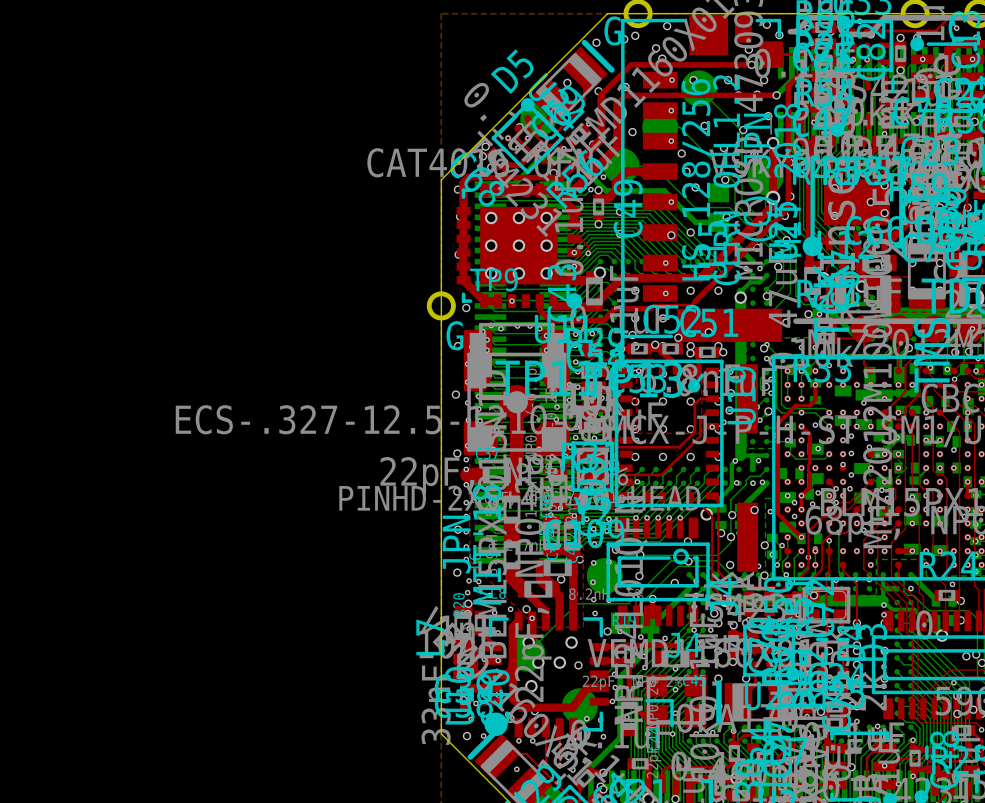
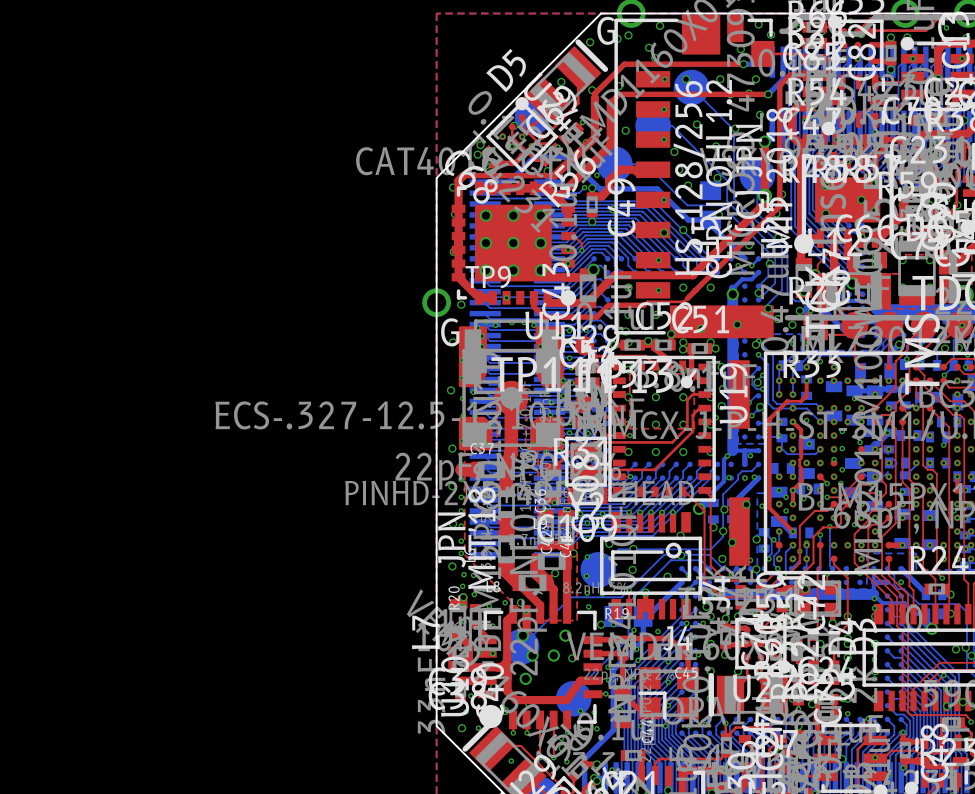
via: none -> (768, 308)
via: none -> (737, 324)
via: none -> (792, 324)
via: none -> (732, 542)

